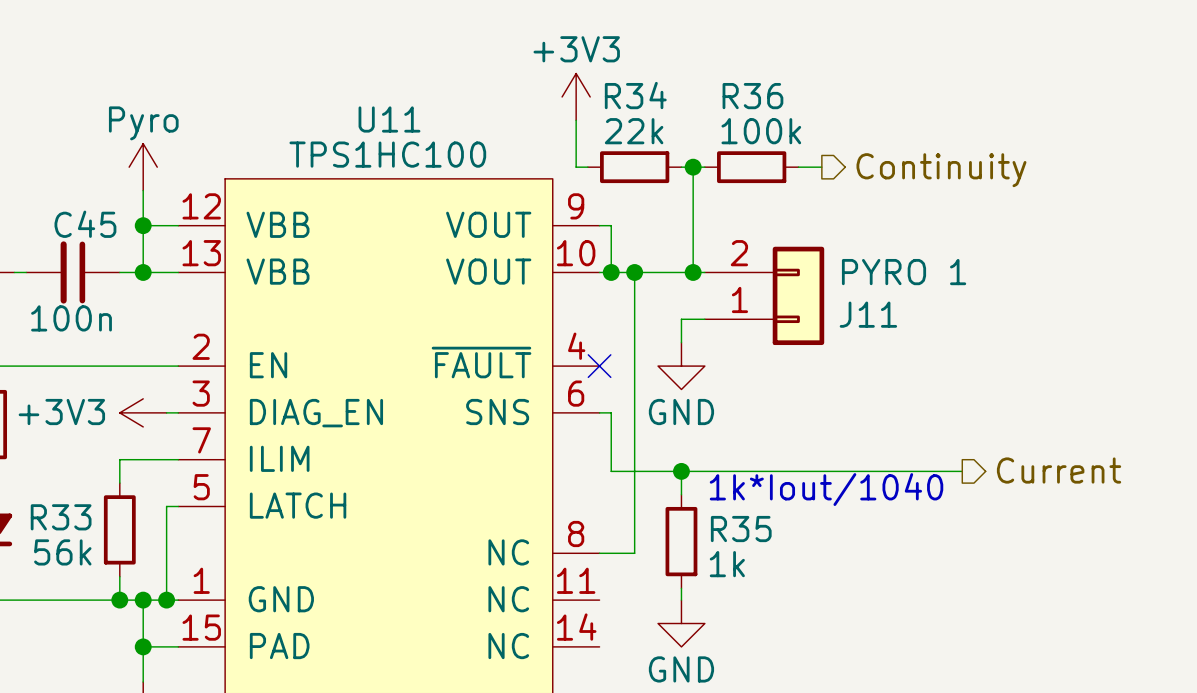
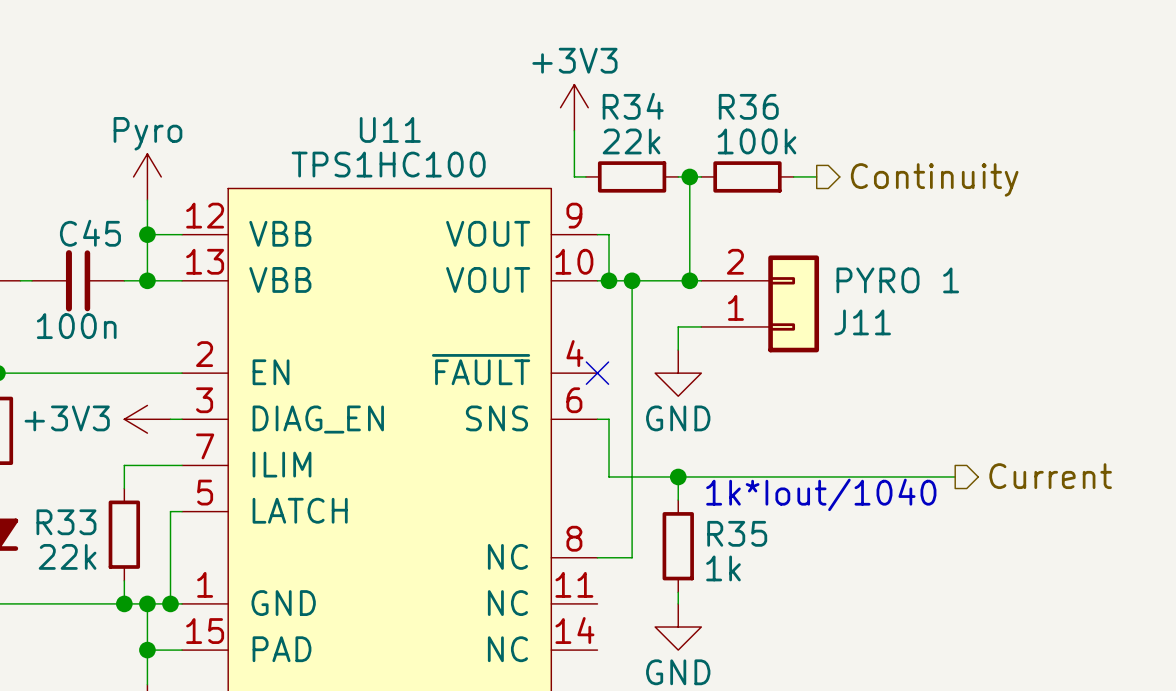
R33 value: 56k (62, 552) -> 22k (67, 556)

